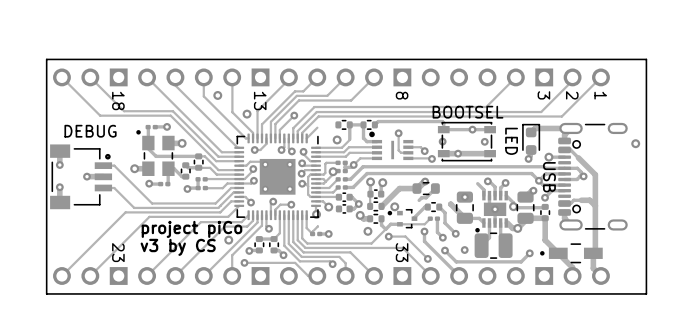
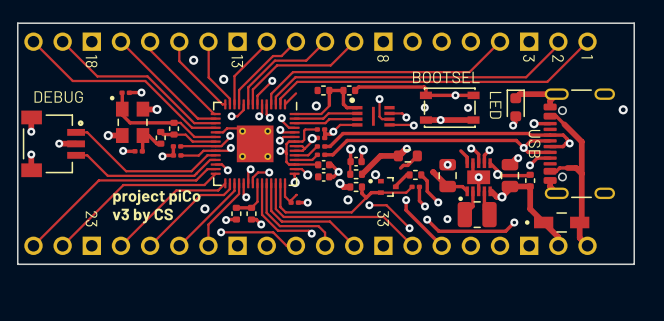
part text: none -> USB (534, 143)
text: USB (549, 177) -> none

